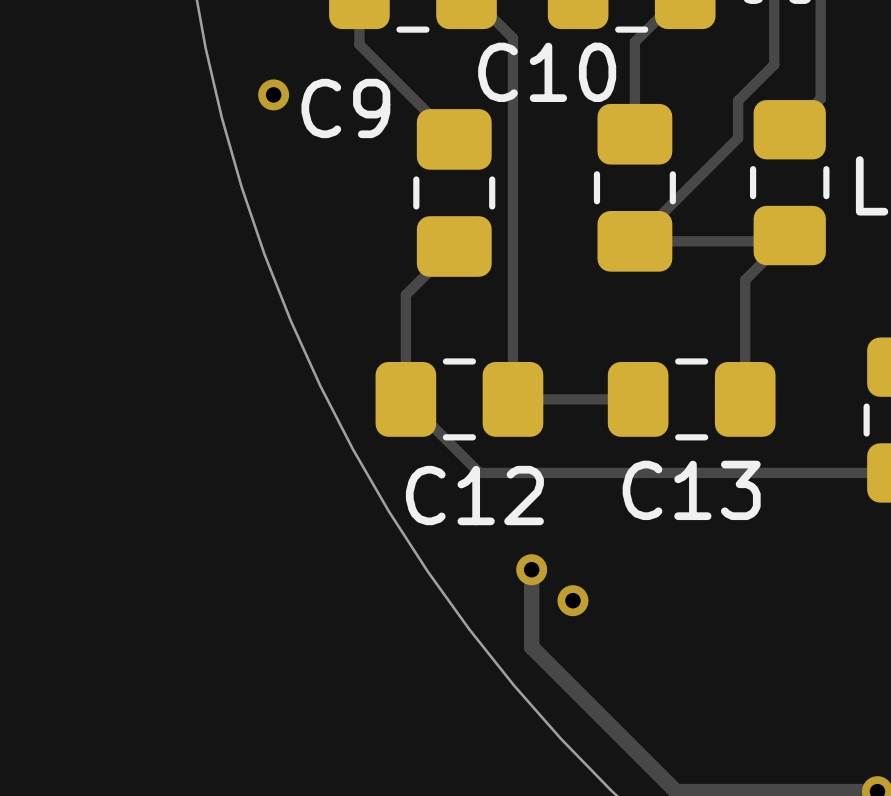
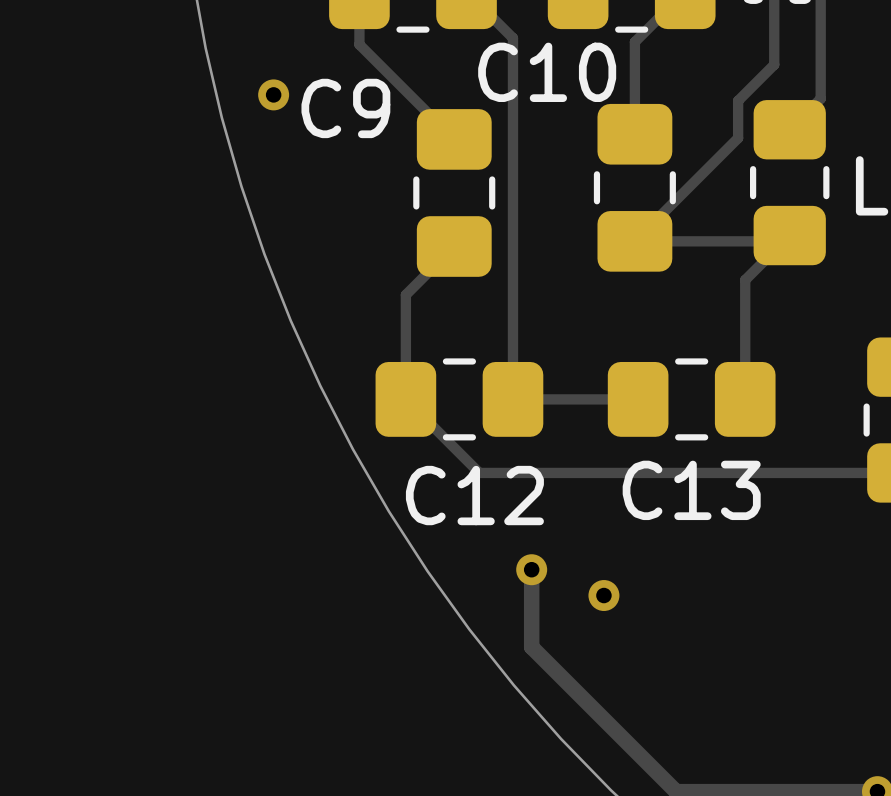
via position: (572, 600) -> (603, 595)

